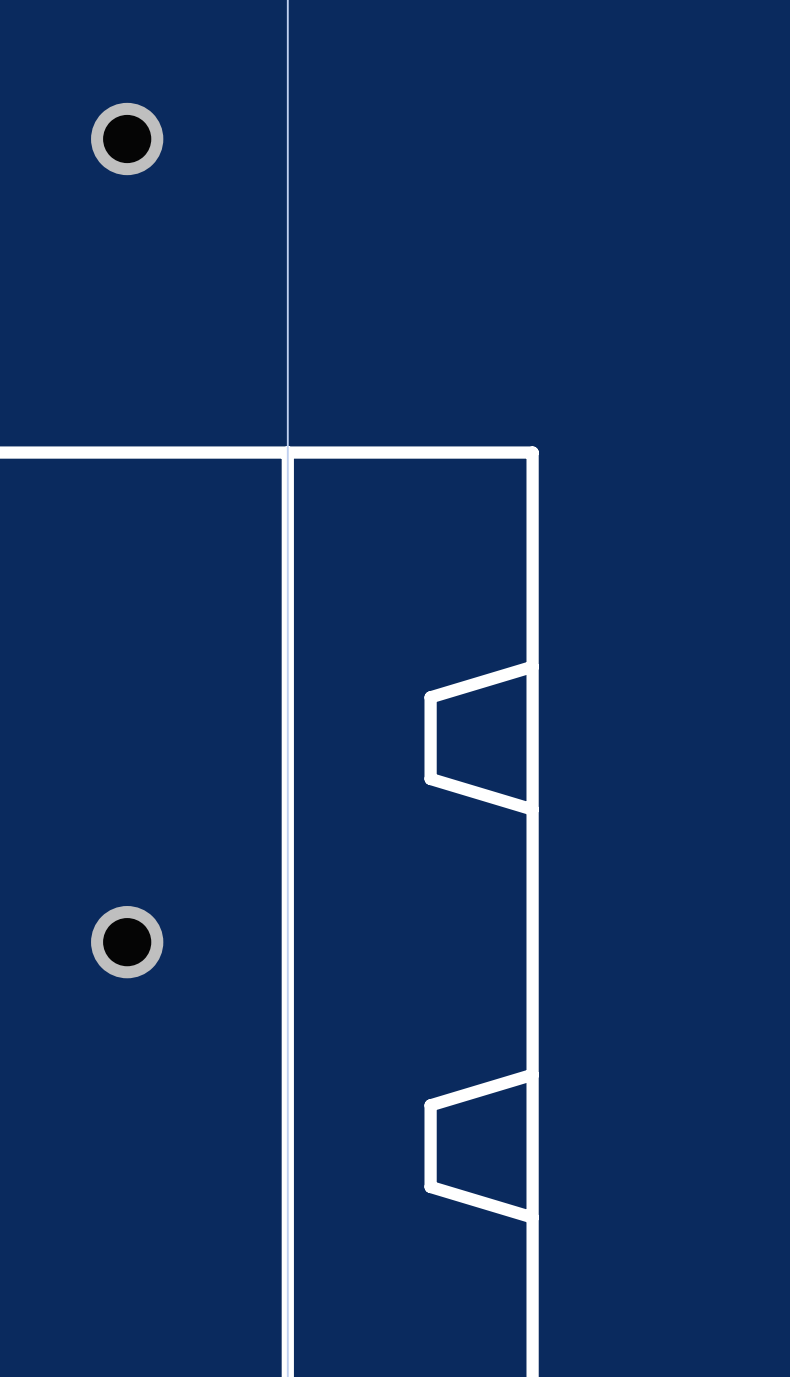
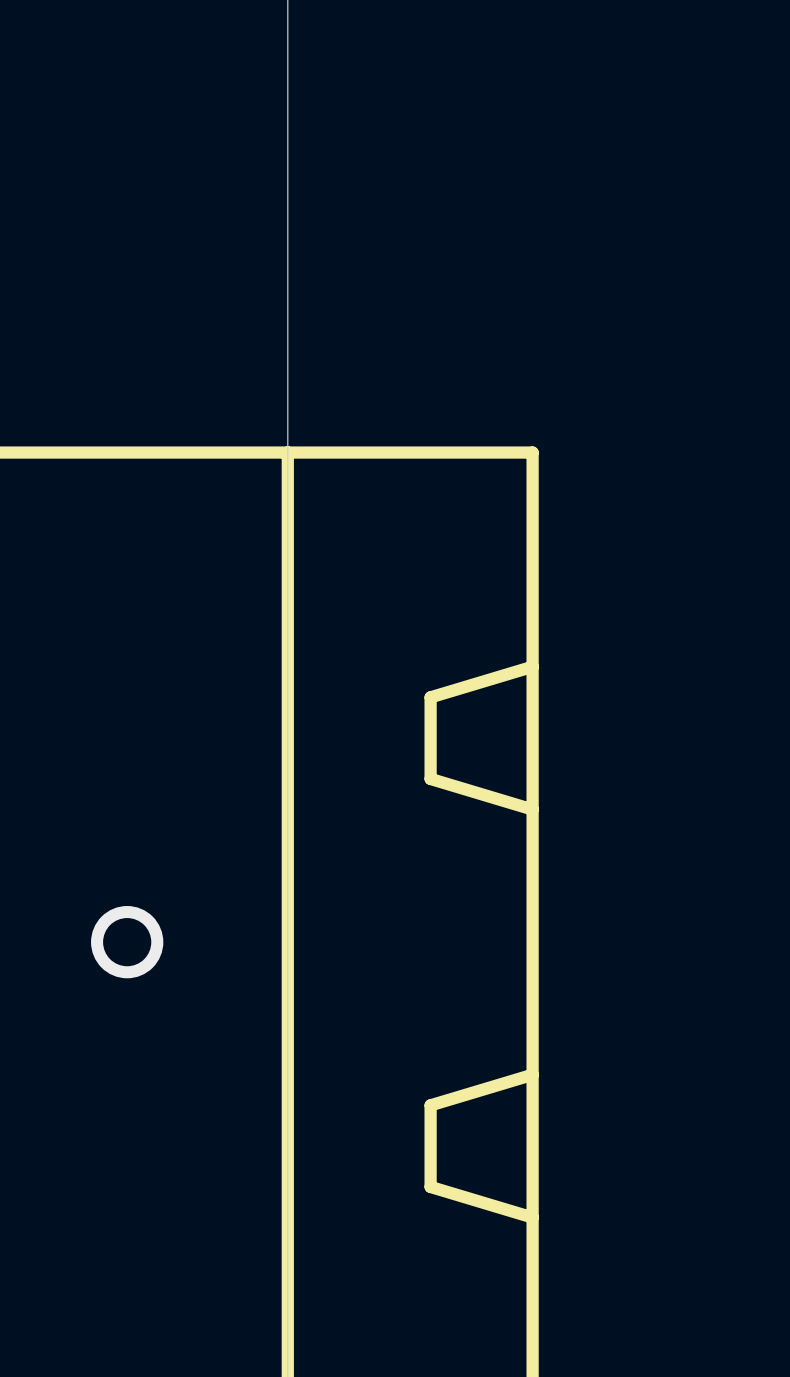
via: (127, 139) -> none

